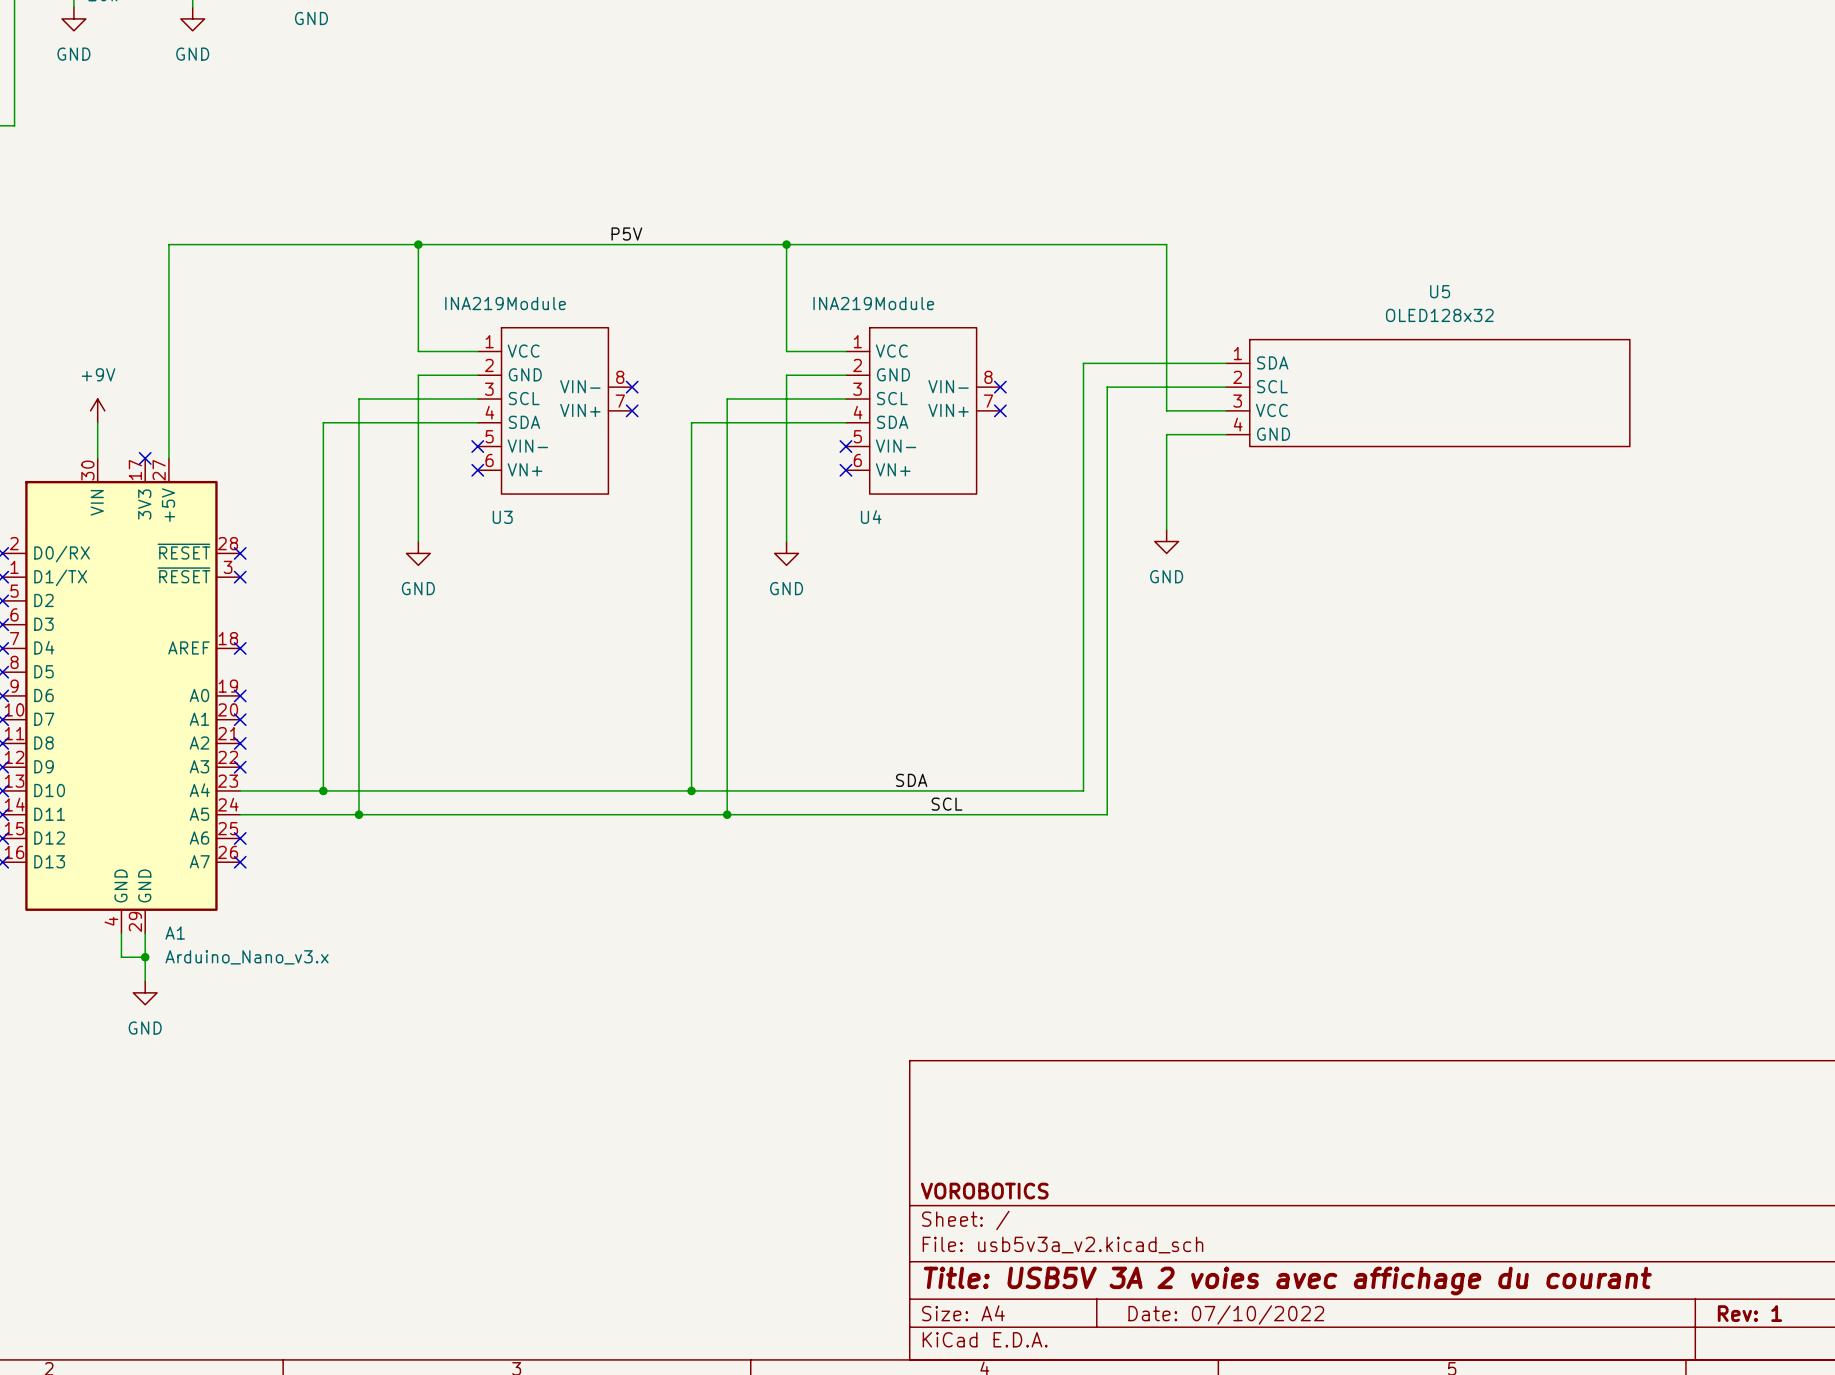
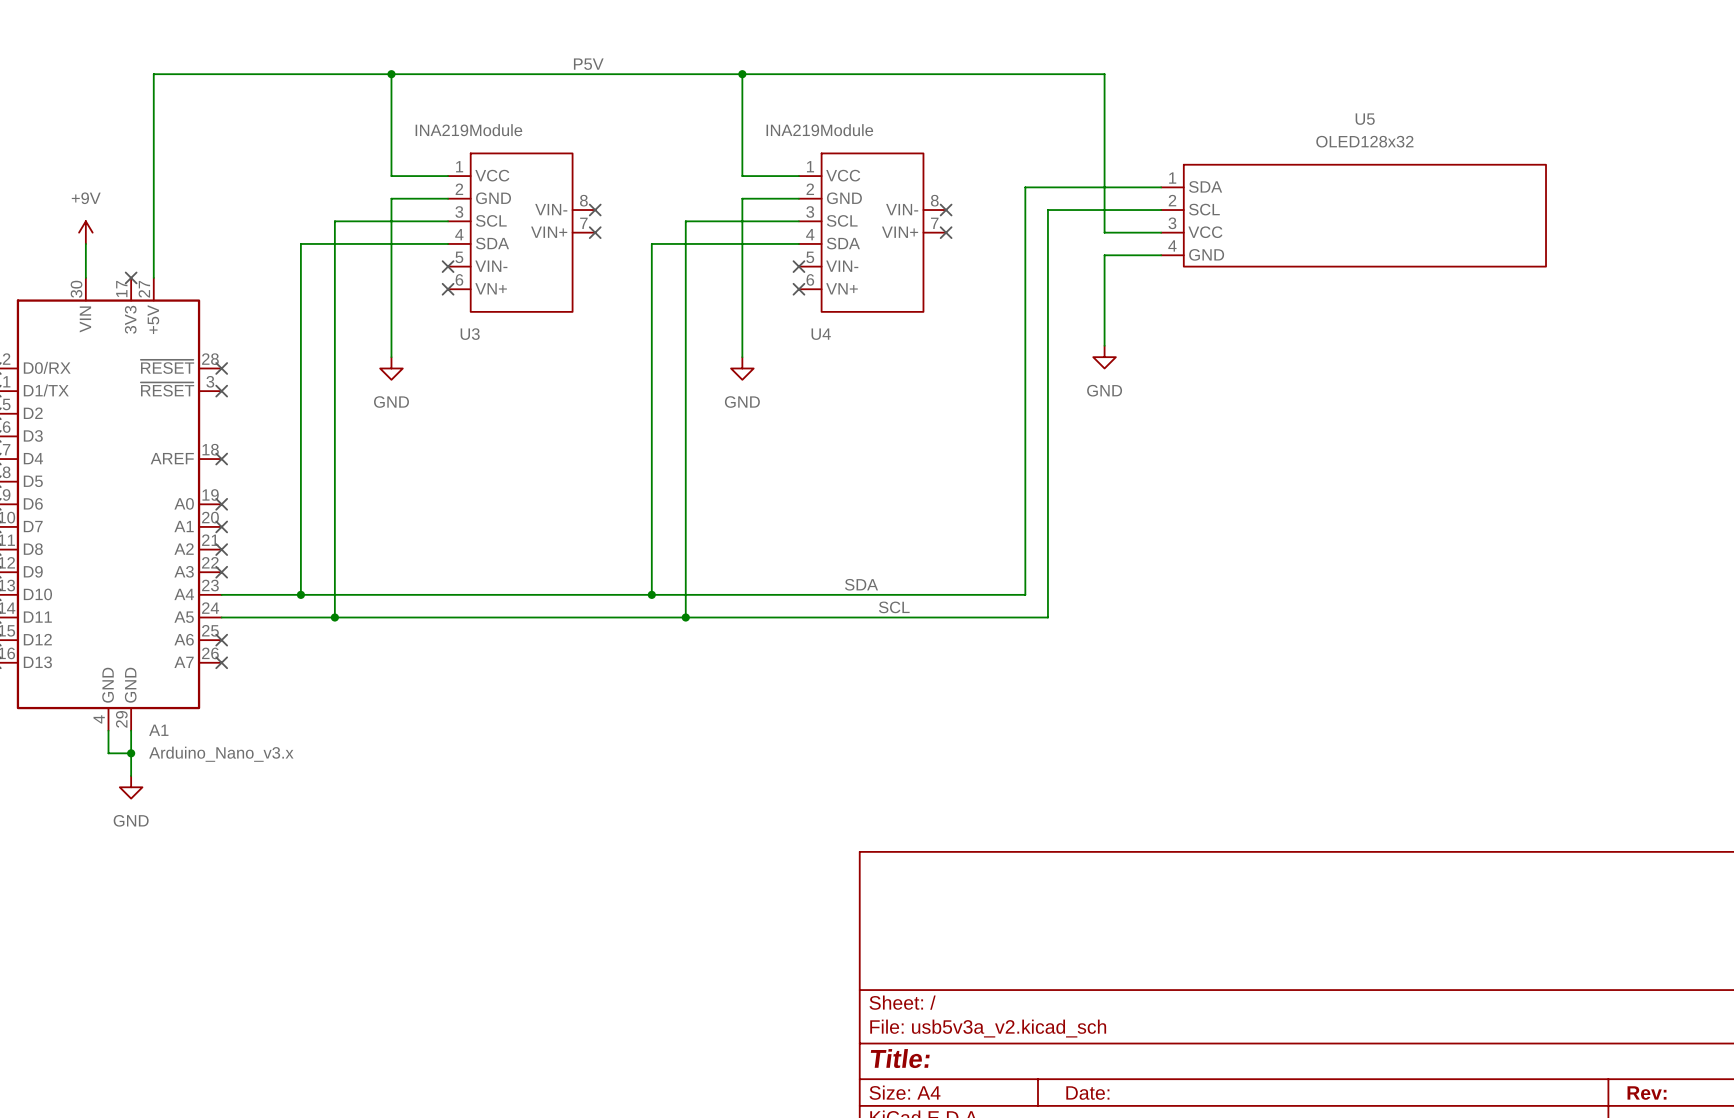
title block: VOROBOTICS (984, 1191) -> none
title block: Title: USB5V 3A 2 voies avec affichage du courant (1287, 1281) -> Title: (900, 1058)
title block: Rev: 1 (1749, 1313) -> Rev: (1647, 1093)
title block: Date: 07/10/2022 (1226, 1314) -> Date: (1087, 1093)

